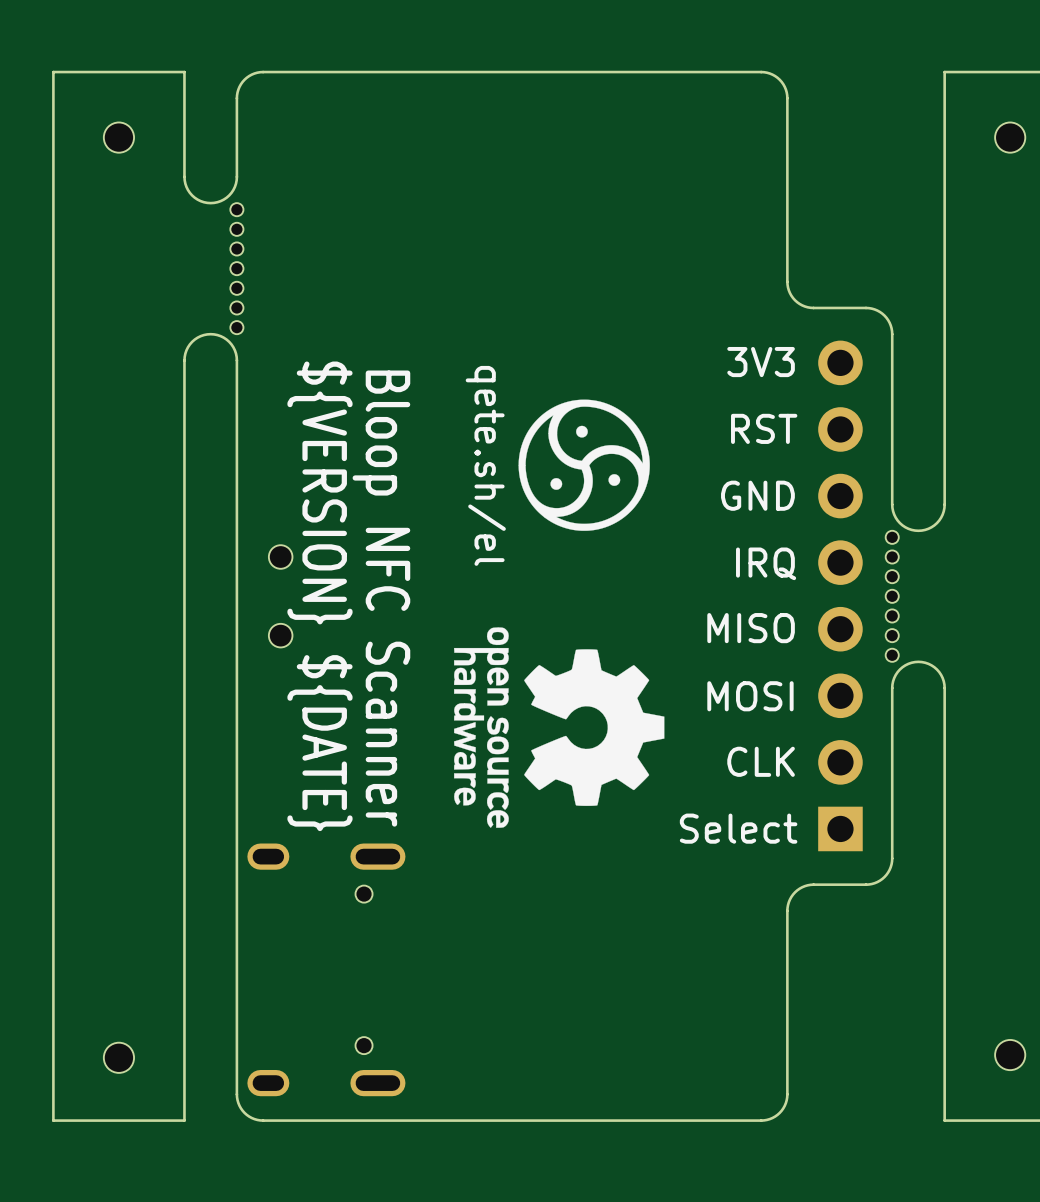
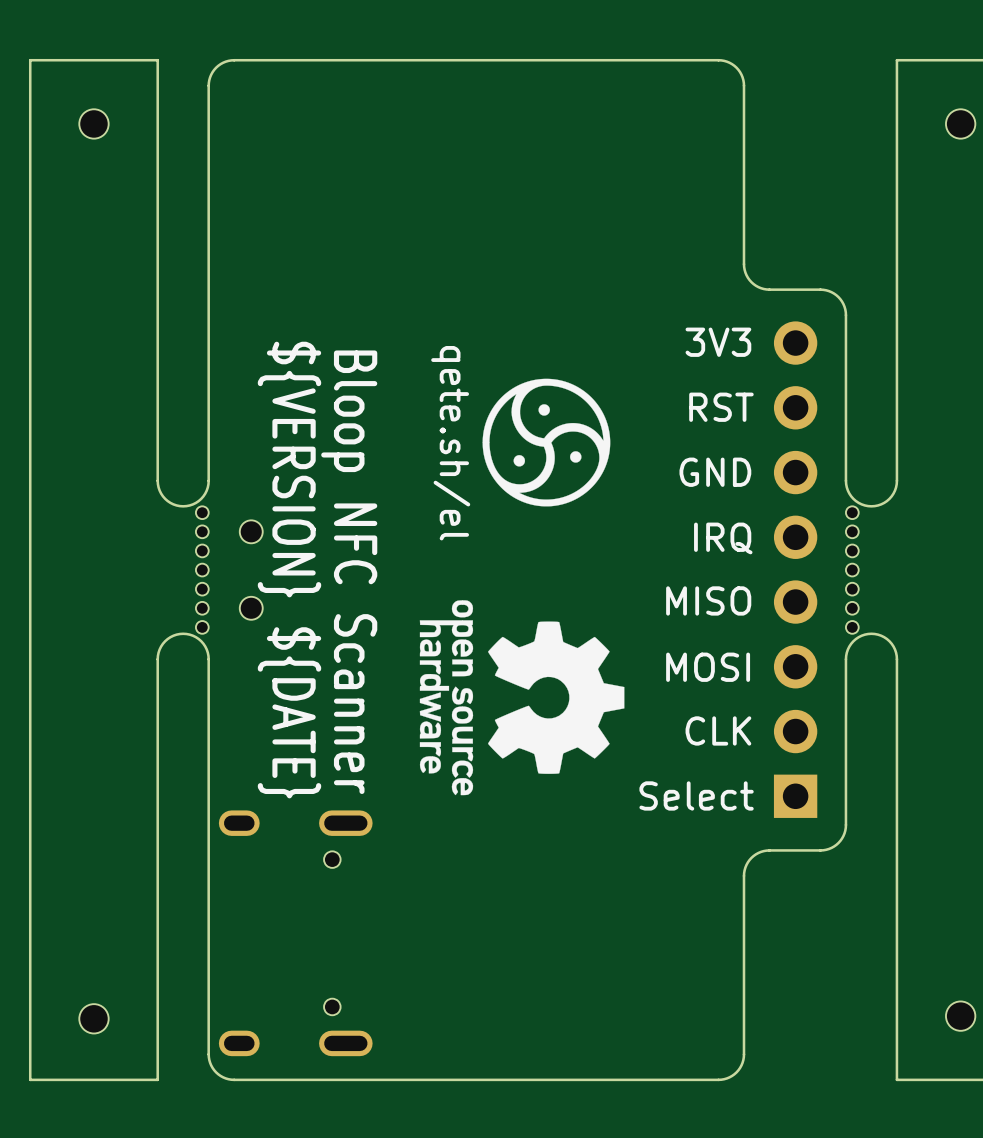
part: (213, 268) -> none
part footprint: [885, 503, 946, 690] -> [844, 479, 899, 661]
board edge: (184, 504) (184, 688) -> (157, 162) (157, 340)
board edge: (236, 504) (236, 688) -> (208, 162) (208, 340)
part: none -> (183, 570)

